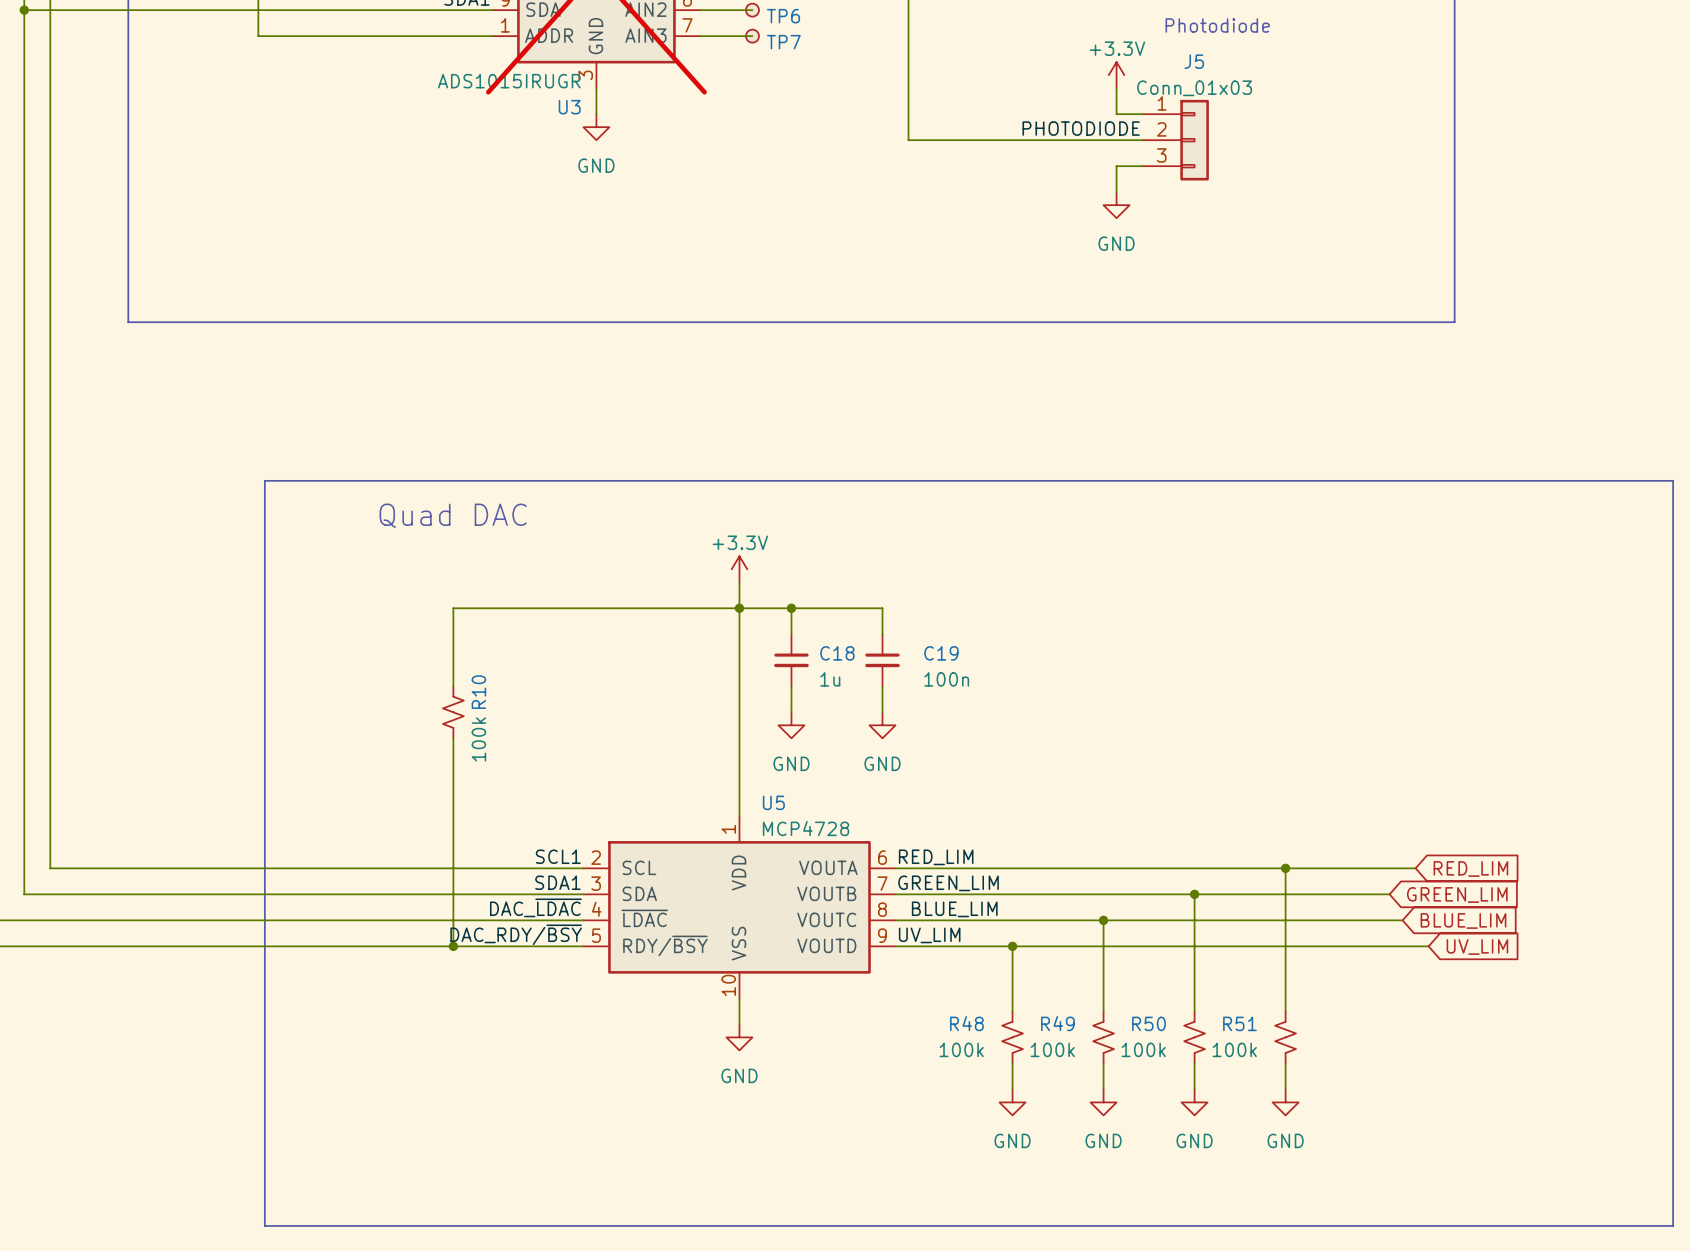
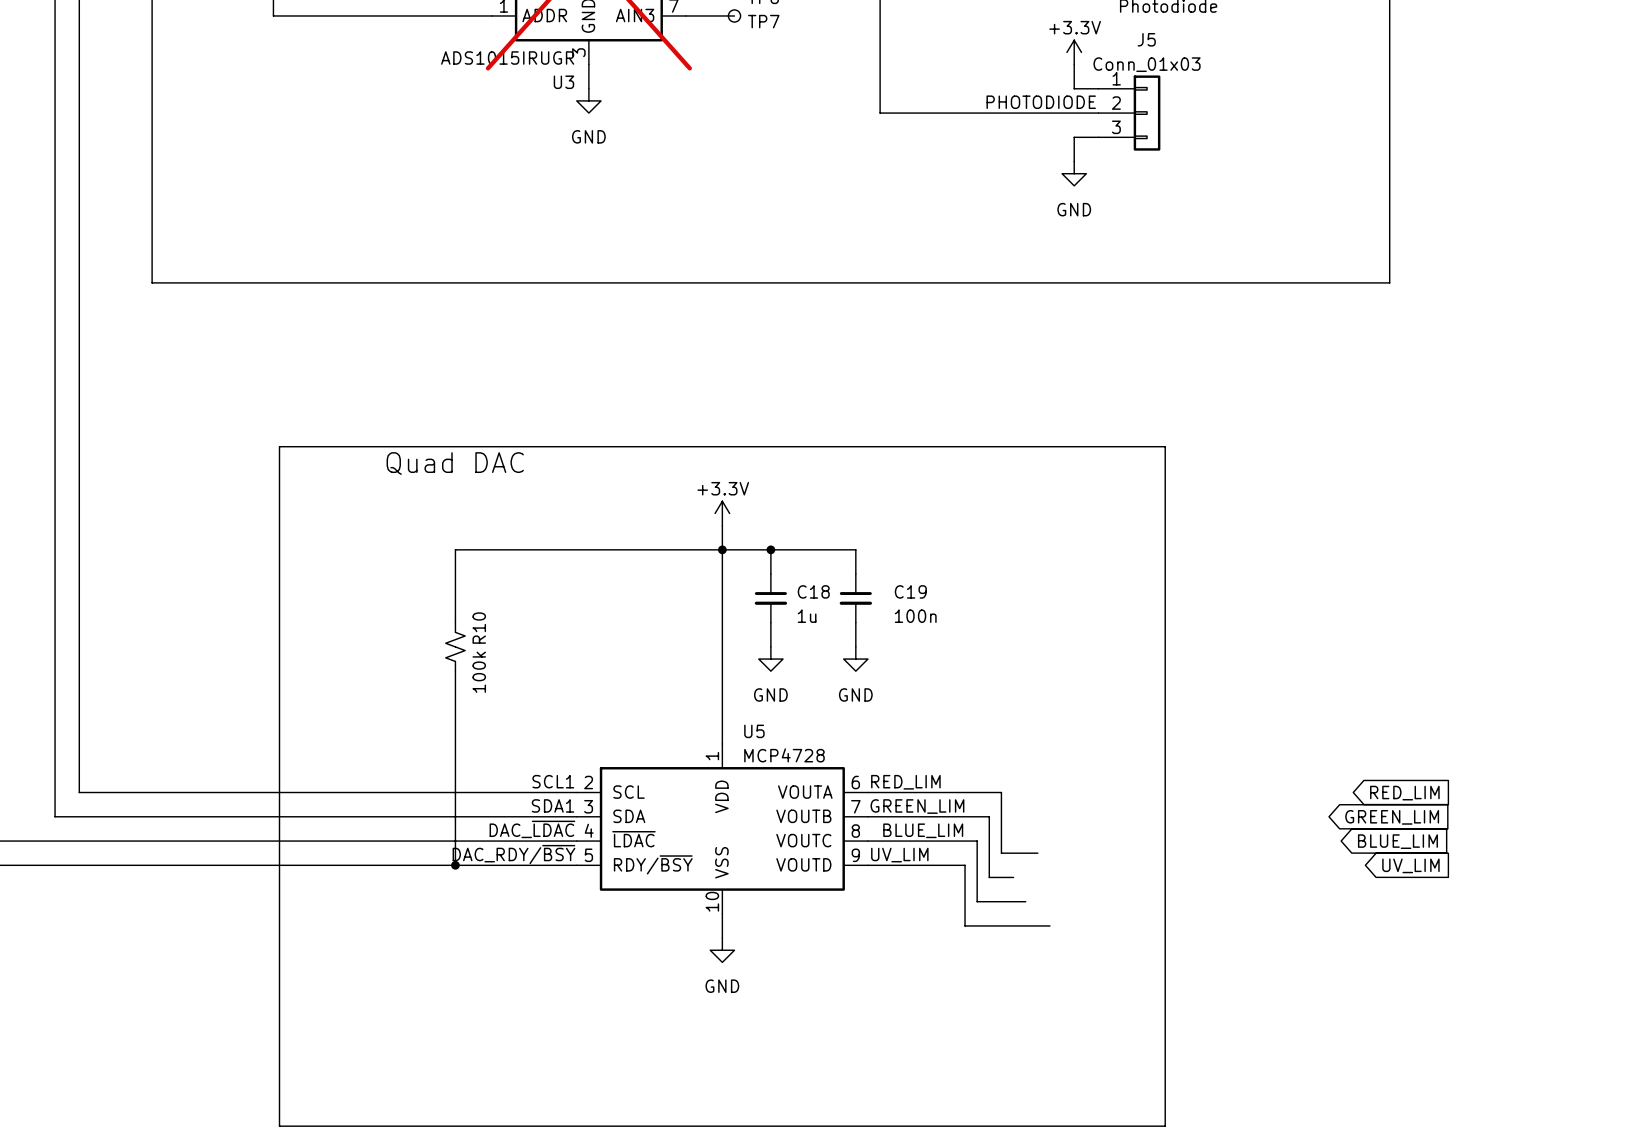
line: (264, 497) (264, 480) (1673, 480) (1673, 1225) (1214, 1225) -> (279, 446) (1165, 446) (1165, 1126)
wire: (1038, 868) (1415, 868) -> (1001, 792) (1001, 853) (1037, 853)
wire: (1285, 868) (1285, 1011) -> none
junction: (1285, 868) -> none
wire: (1025, 894) (1389, 894) -> (989, 816) (989, 877) (1013, 877)
wire: (1194, 894) (1194, 1011) -> none
junction: (1194, 894) -> none
wire: (1012, 920) (1402, 920) -> (977, 841) (977, 865)
wire: (1103, 920) (1103, 1011) -> none
junction: (1103, 920) -> none
wire: (999, 946) (1428, 946) -> (965, 865) (965, 925) (1049, 925)
junction: (1012, 946) -> none
wire: (1012, 985) (1012, 1011) -> (977, 901) (1025, 901)
R48: 100k (1012, 1037) -> none
R49: 100k (1103, 1037) -> none
R50: 100k (1194, 1037) -> none
R51: 100k (1285, 1037) -> none
wire: (1012, 1063) (1012, 1089) -> none
wire: (1103, 1063) (1103, 1089) -> none
wire: (1194, 1063) (1194, 1089) -> none
wire: (1285, 1063) (1285, 1089) -> none
power symbol: GND (1012, 1102) -> none
power symbol: GND (1103, 1102) -> none
power symbol: GND (1194, 1102) -> none
power symbol: GND (1285, 1102) -> none

